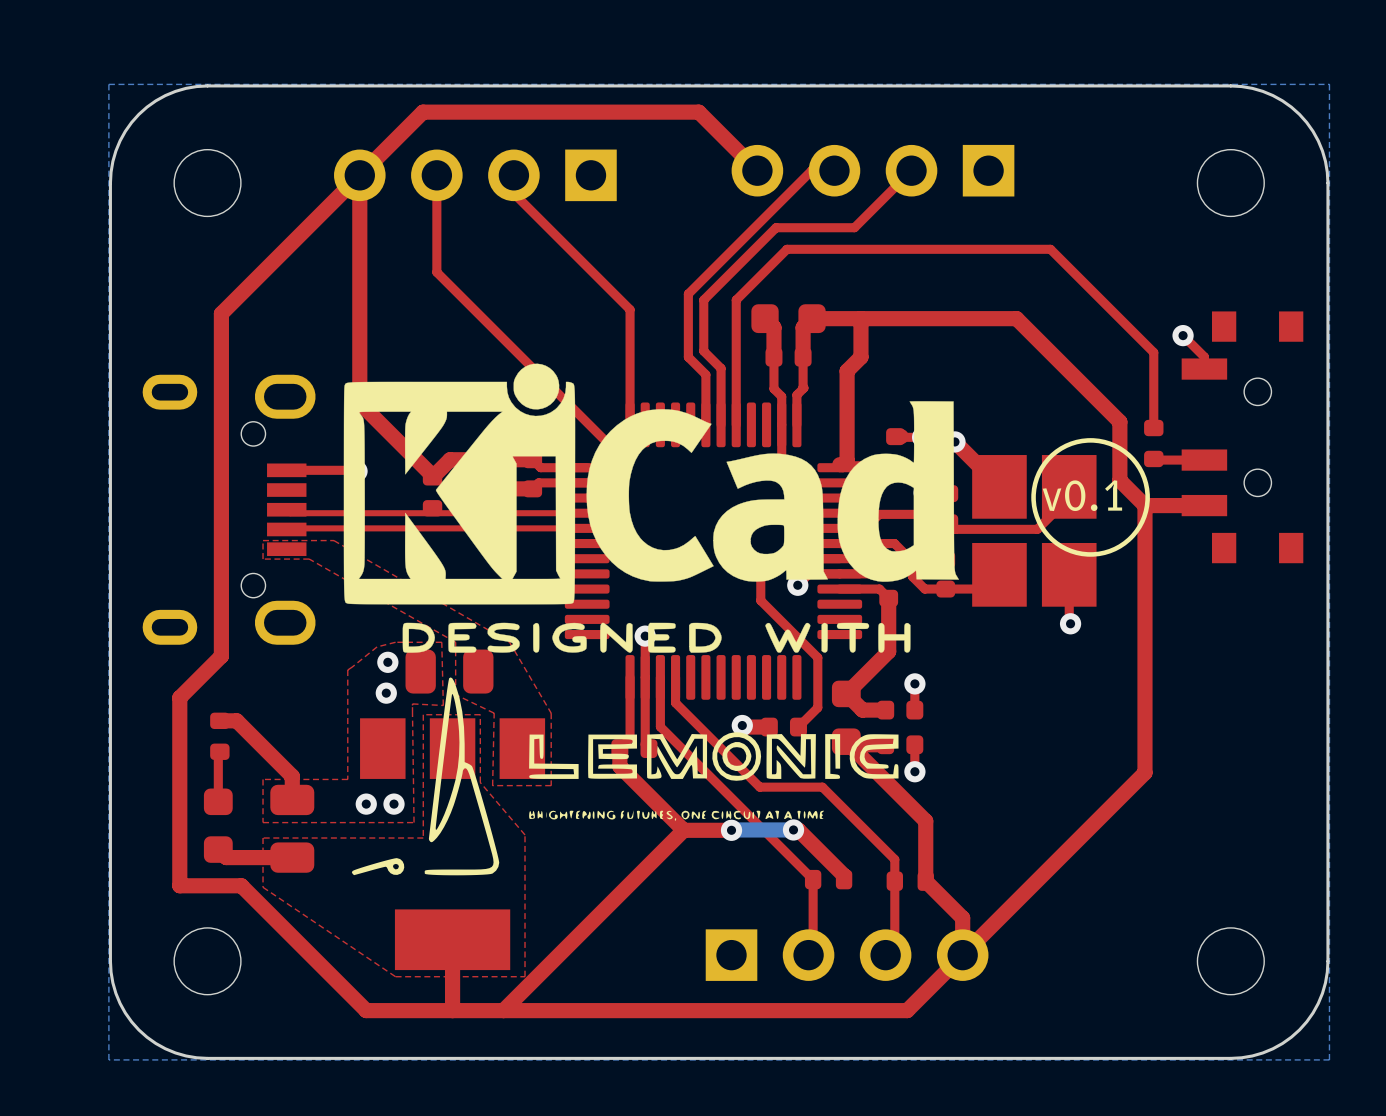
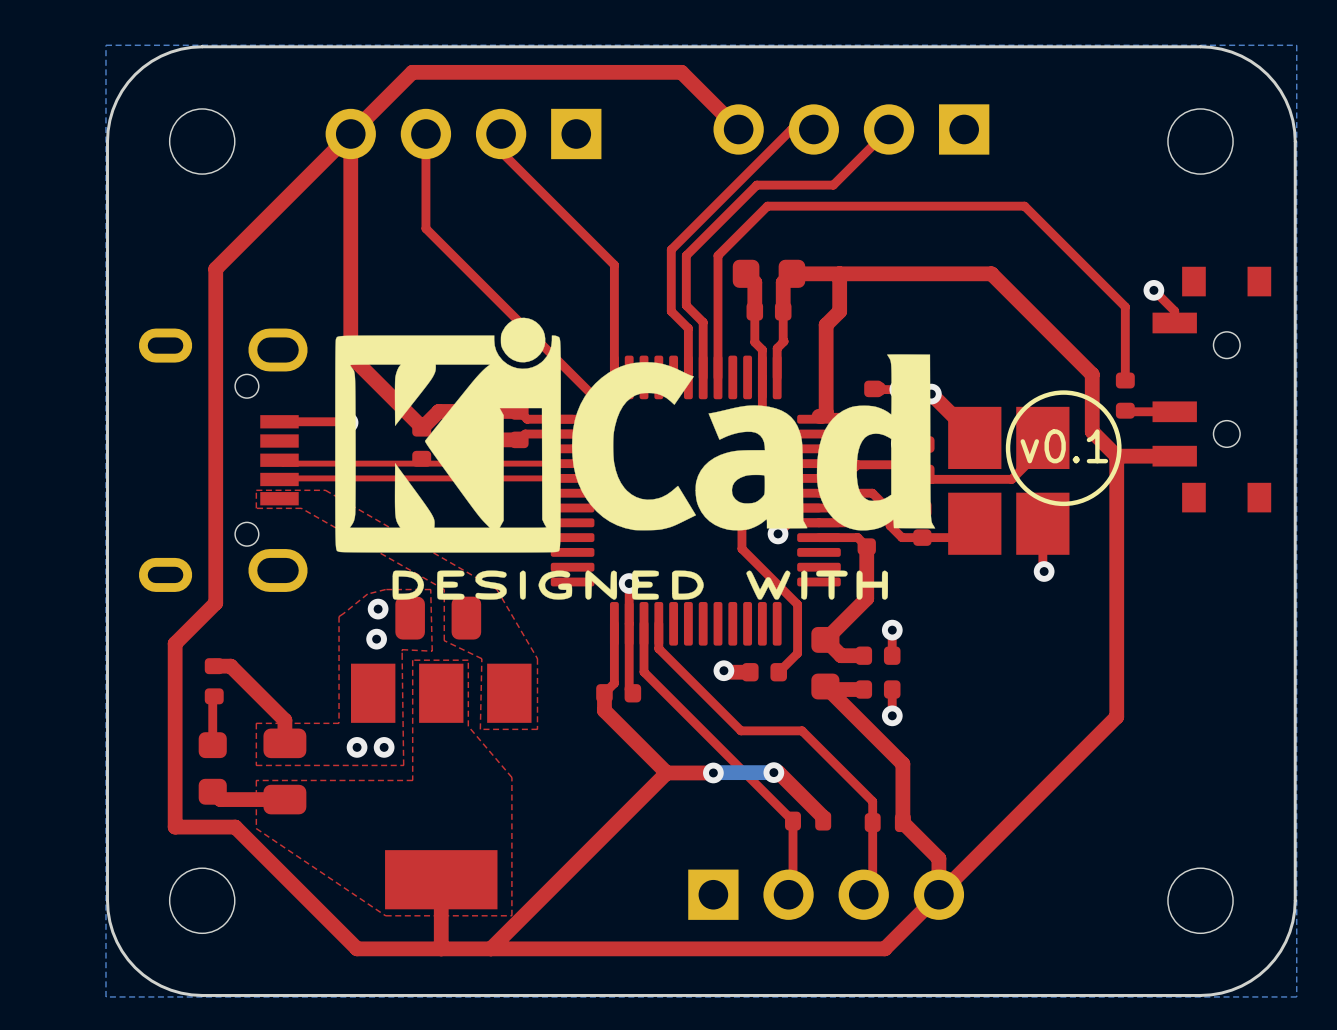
drawing: [351, 677, 899, 876] -> none

